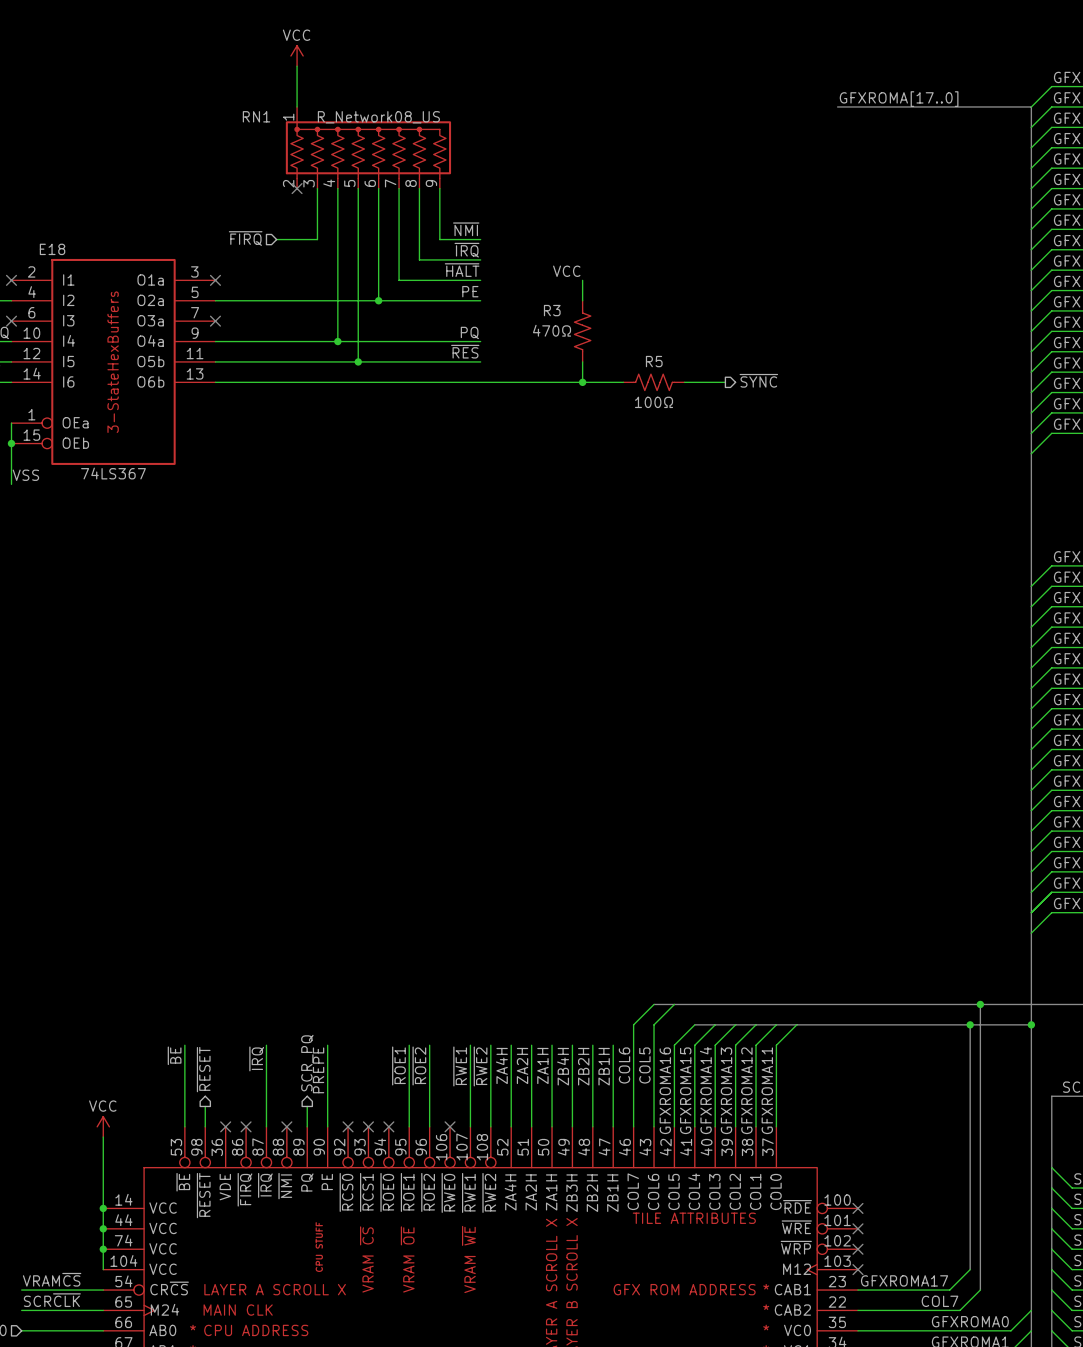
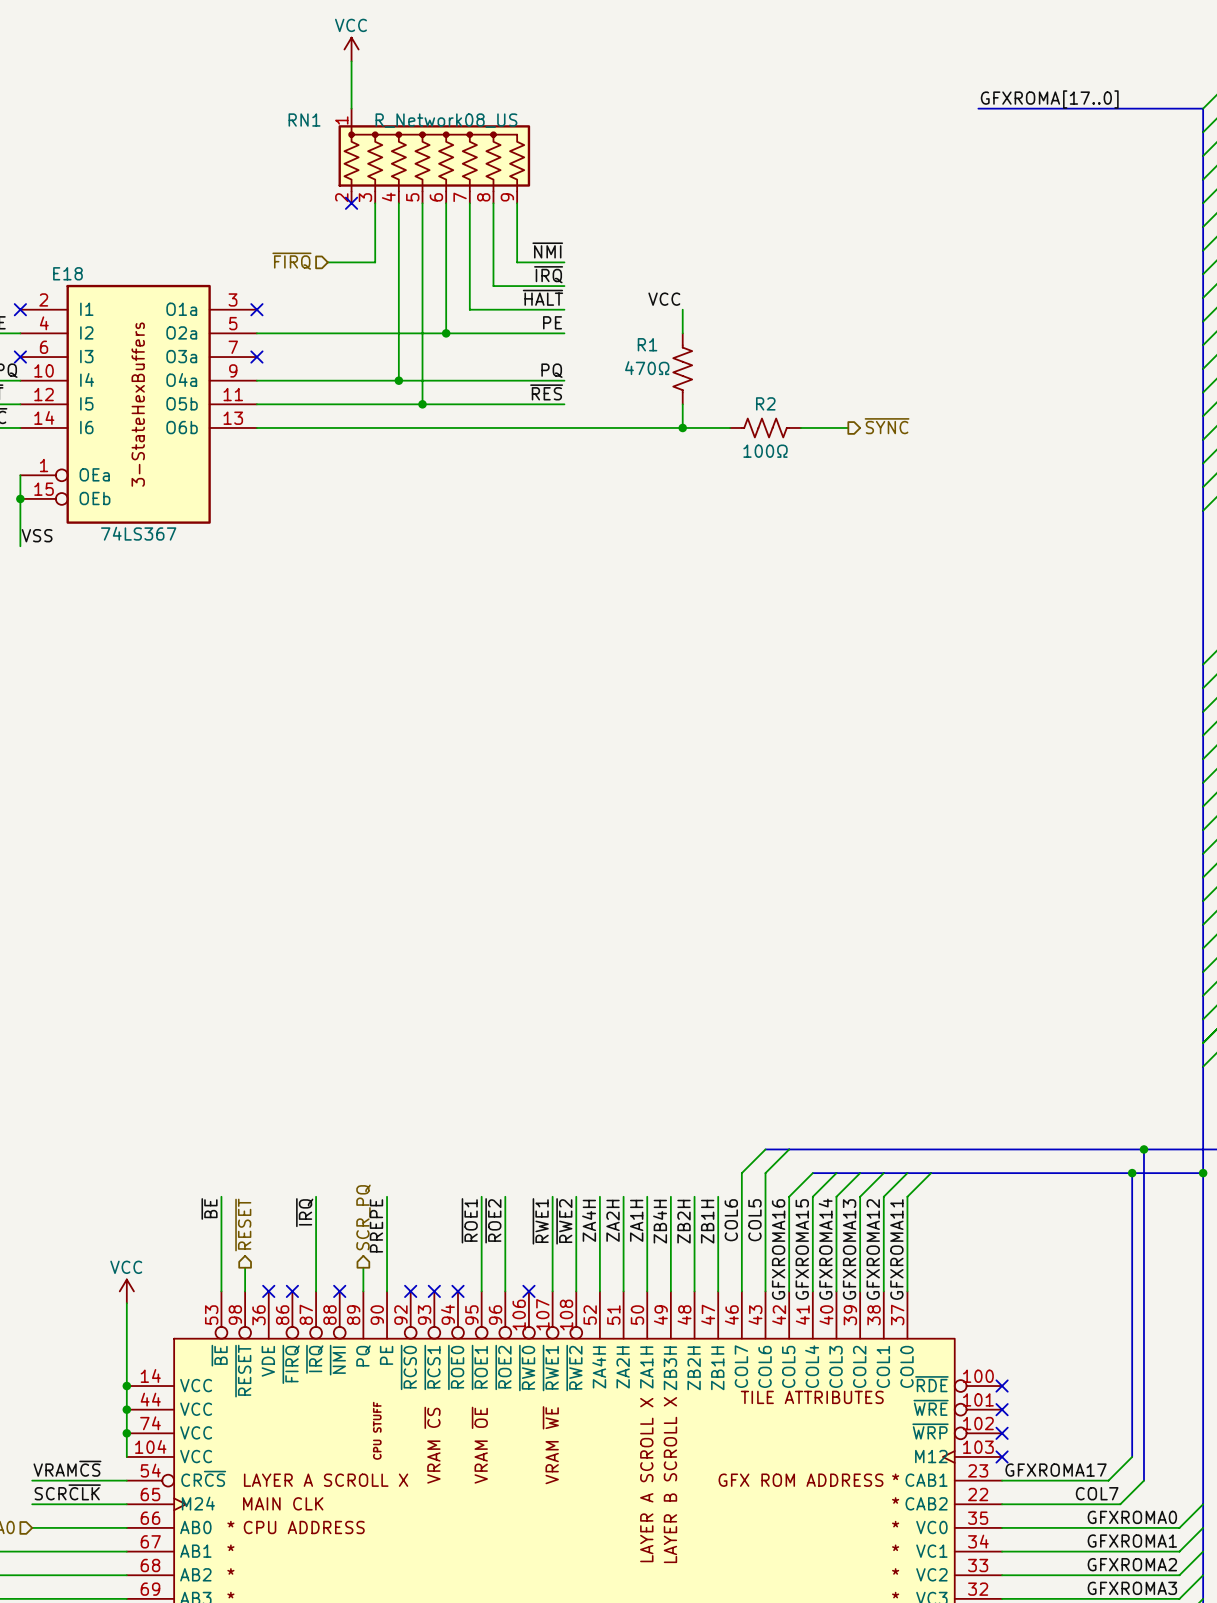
R3 name: R3 (552, 310) -> R1 (647, 344)
R5 name: R5 (654, 361) -> R2 (765, 403)

